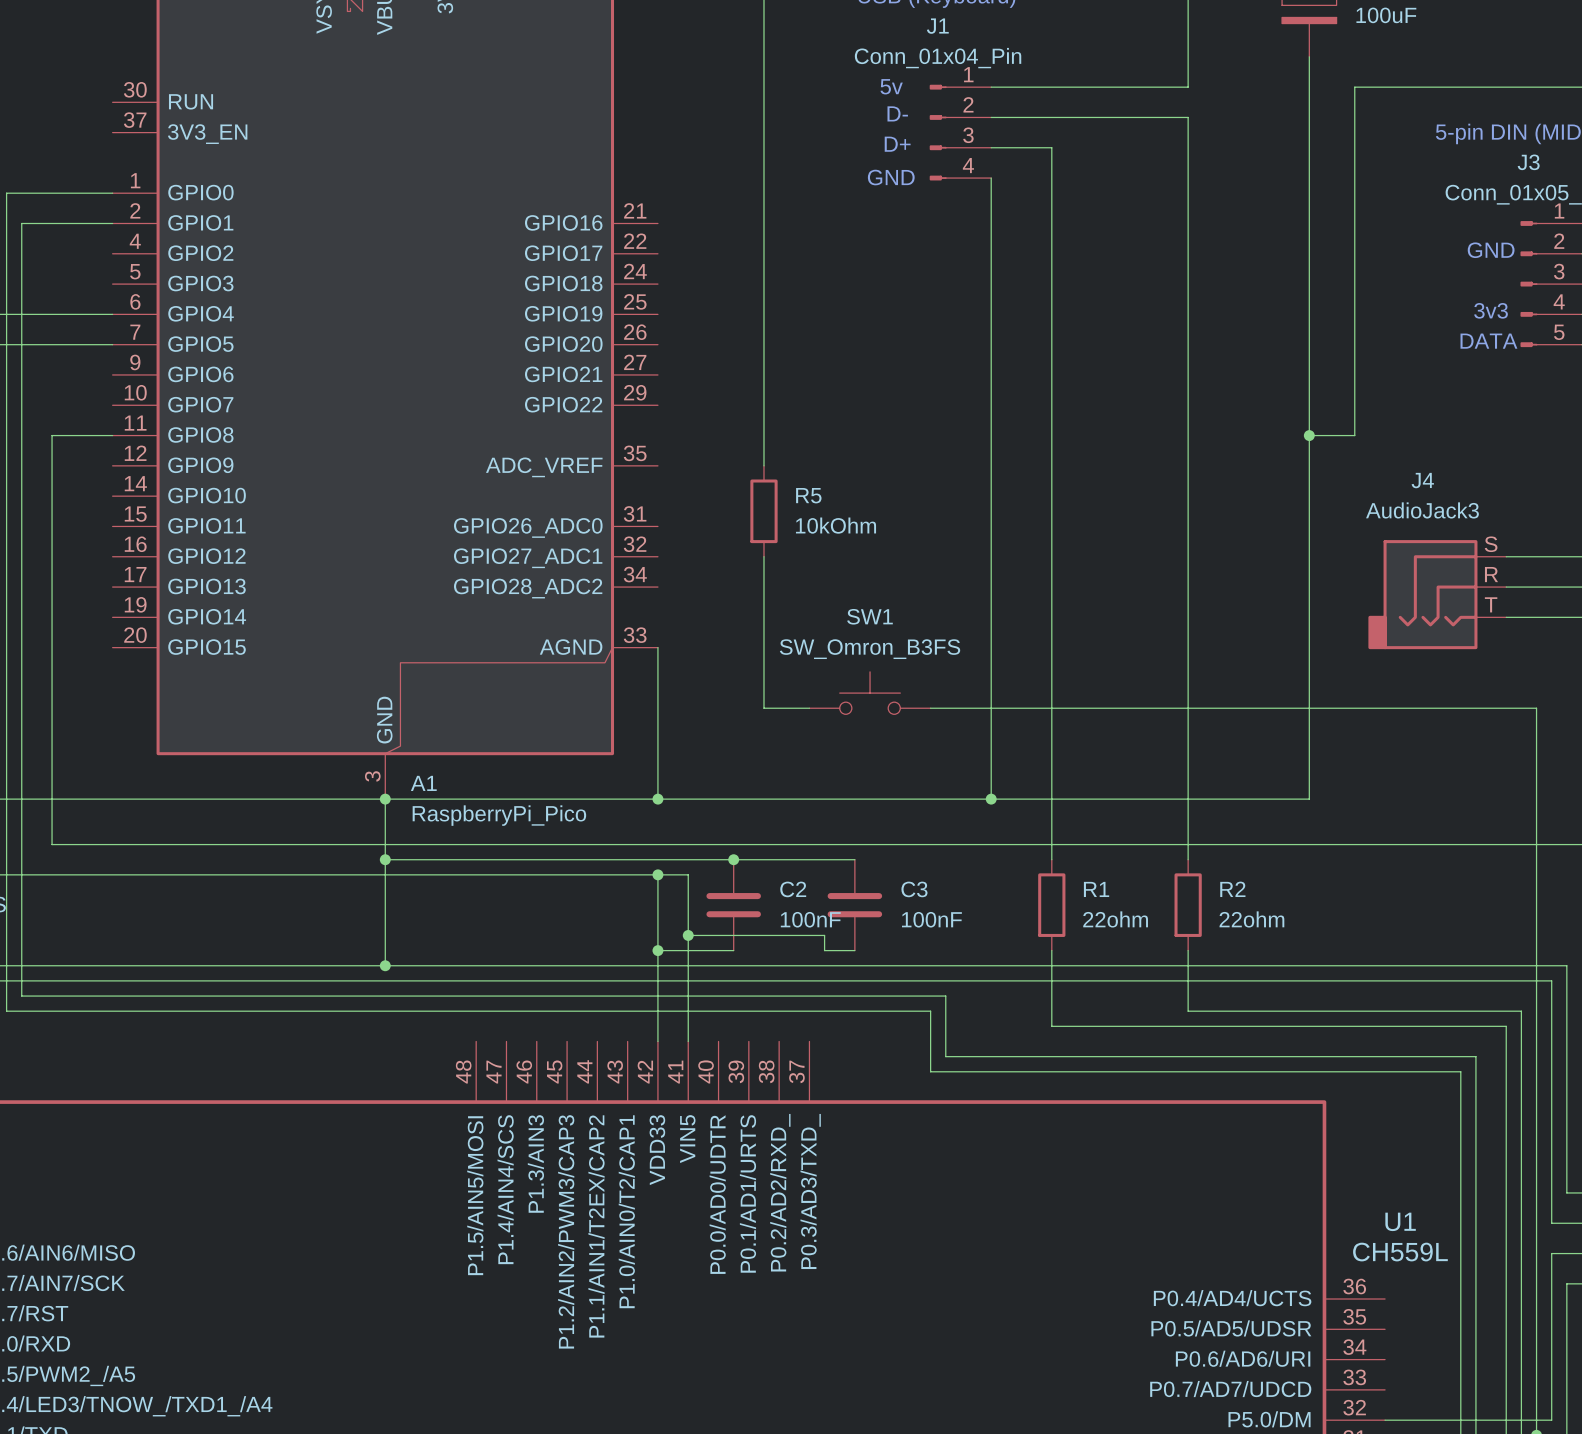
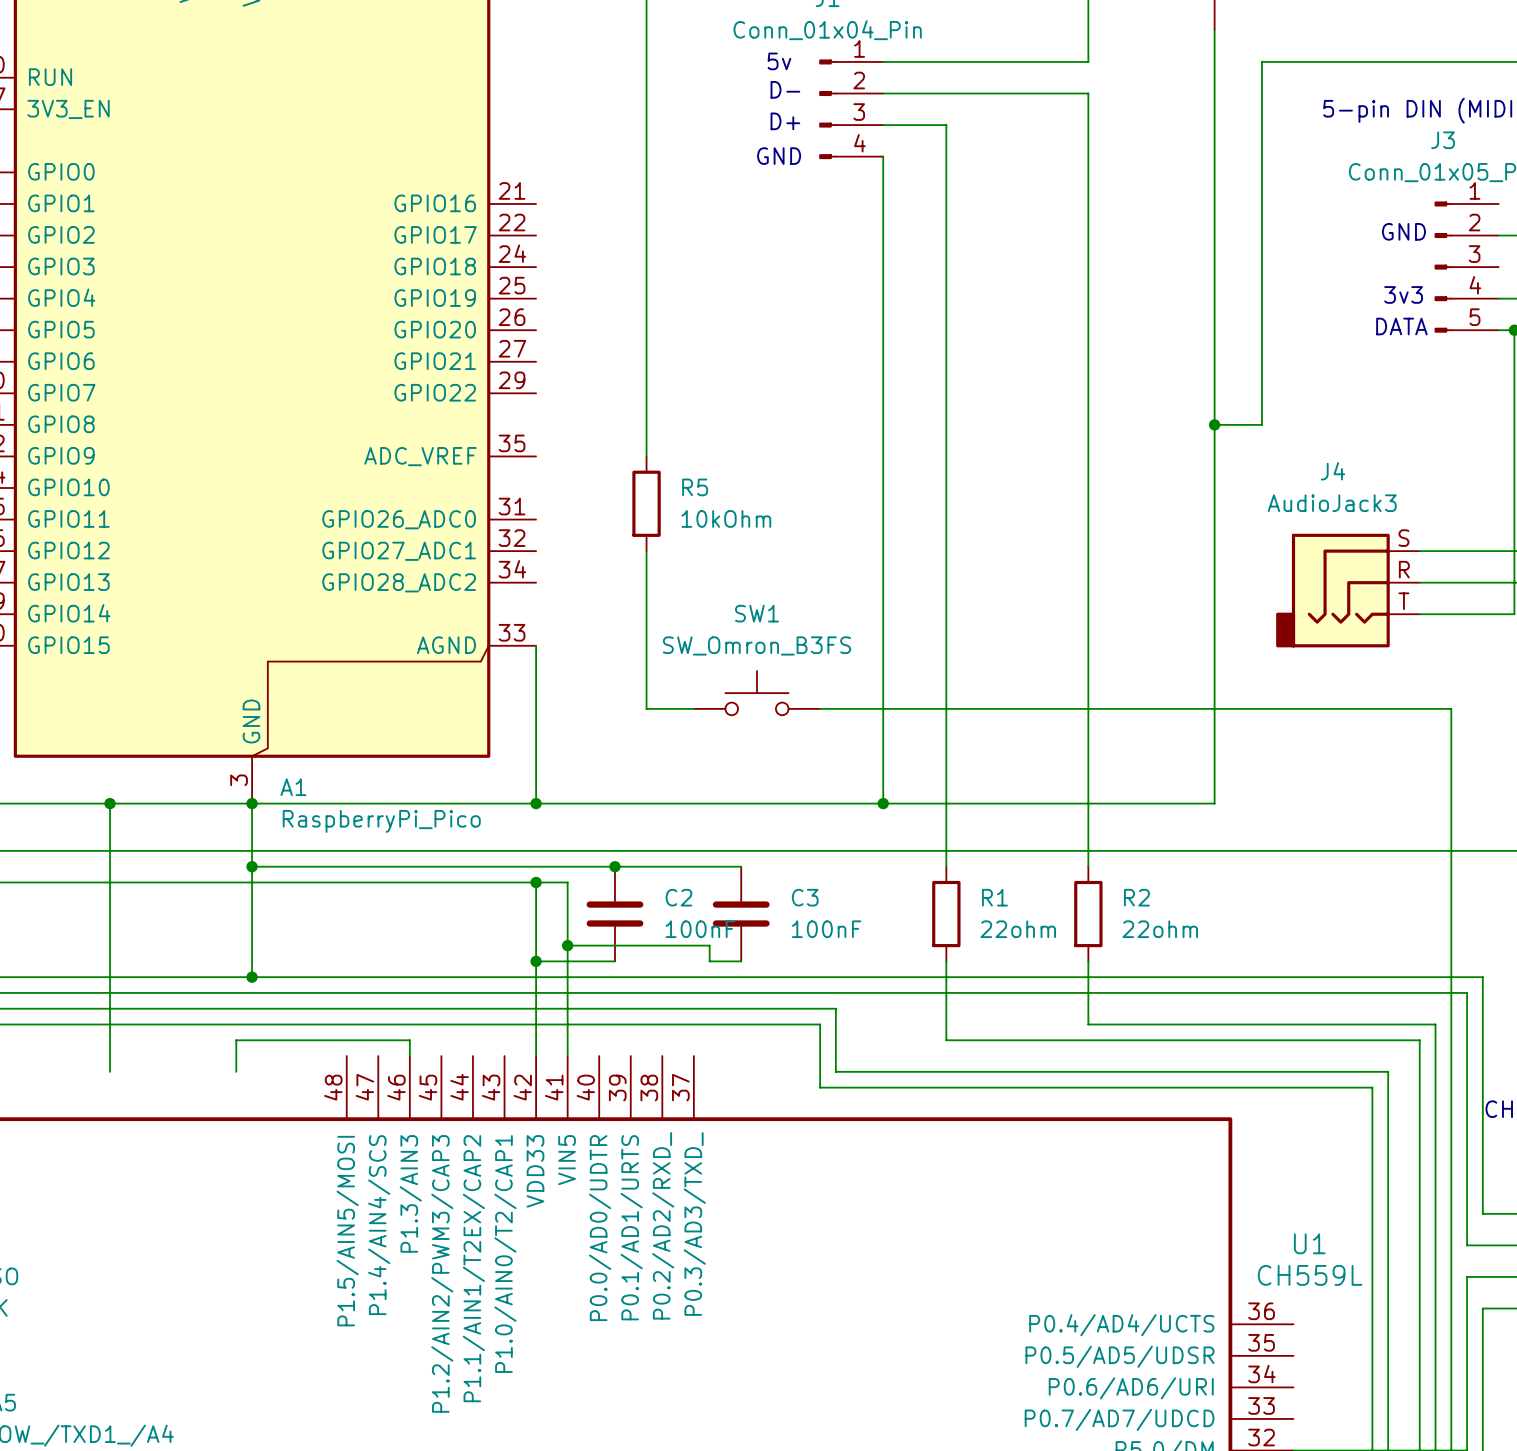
wire: none -> (110, 803) (110, 1071)
junction: none -> (110, 803)
wire: none -> (409, 1056) (409, 1040) (236, 1040) (236, 1071)

